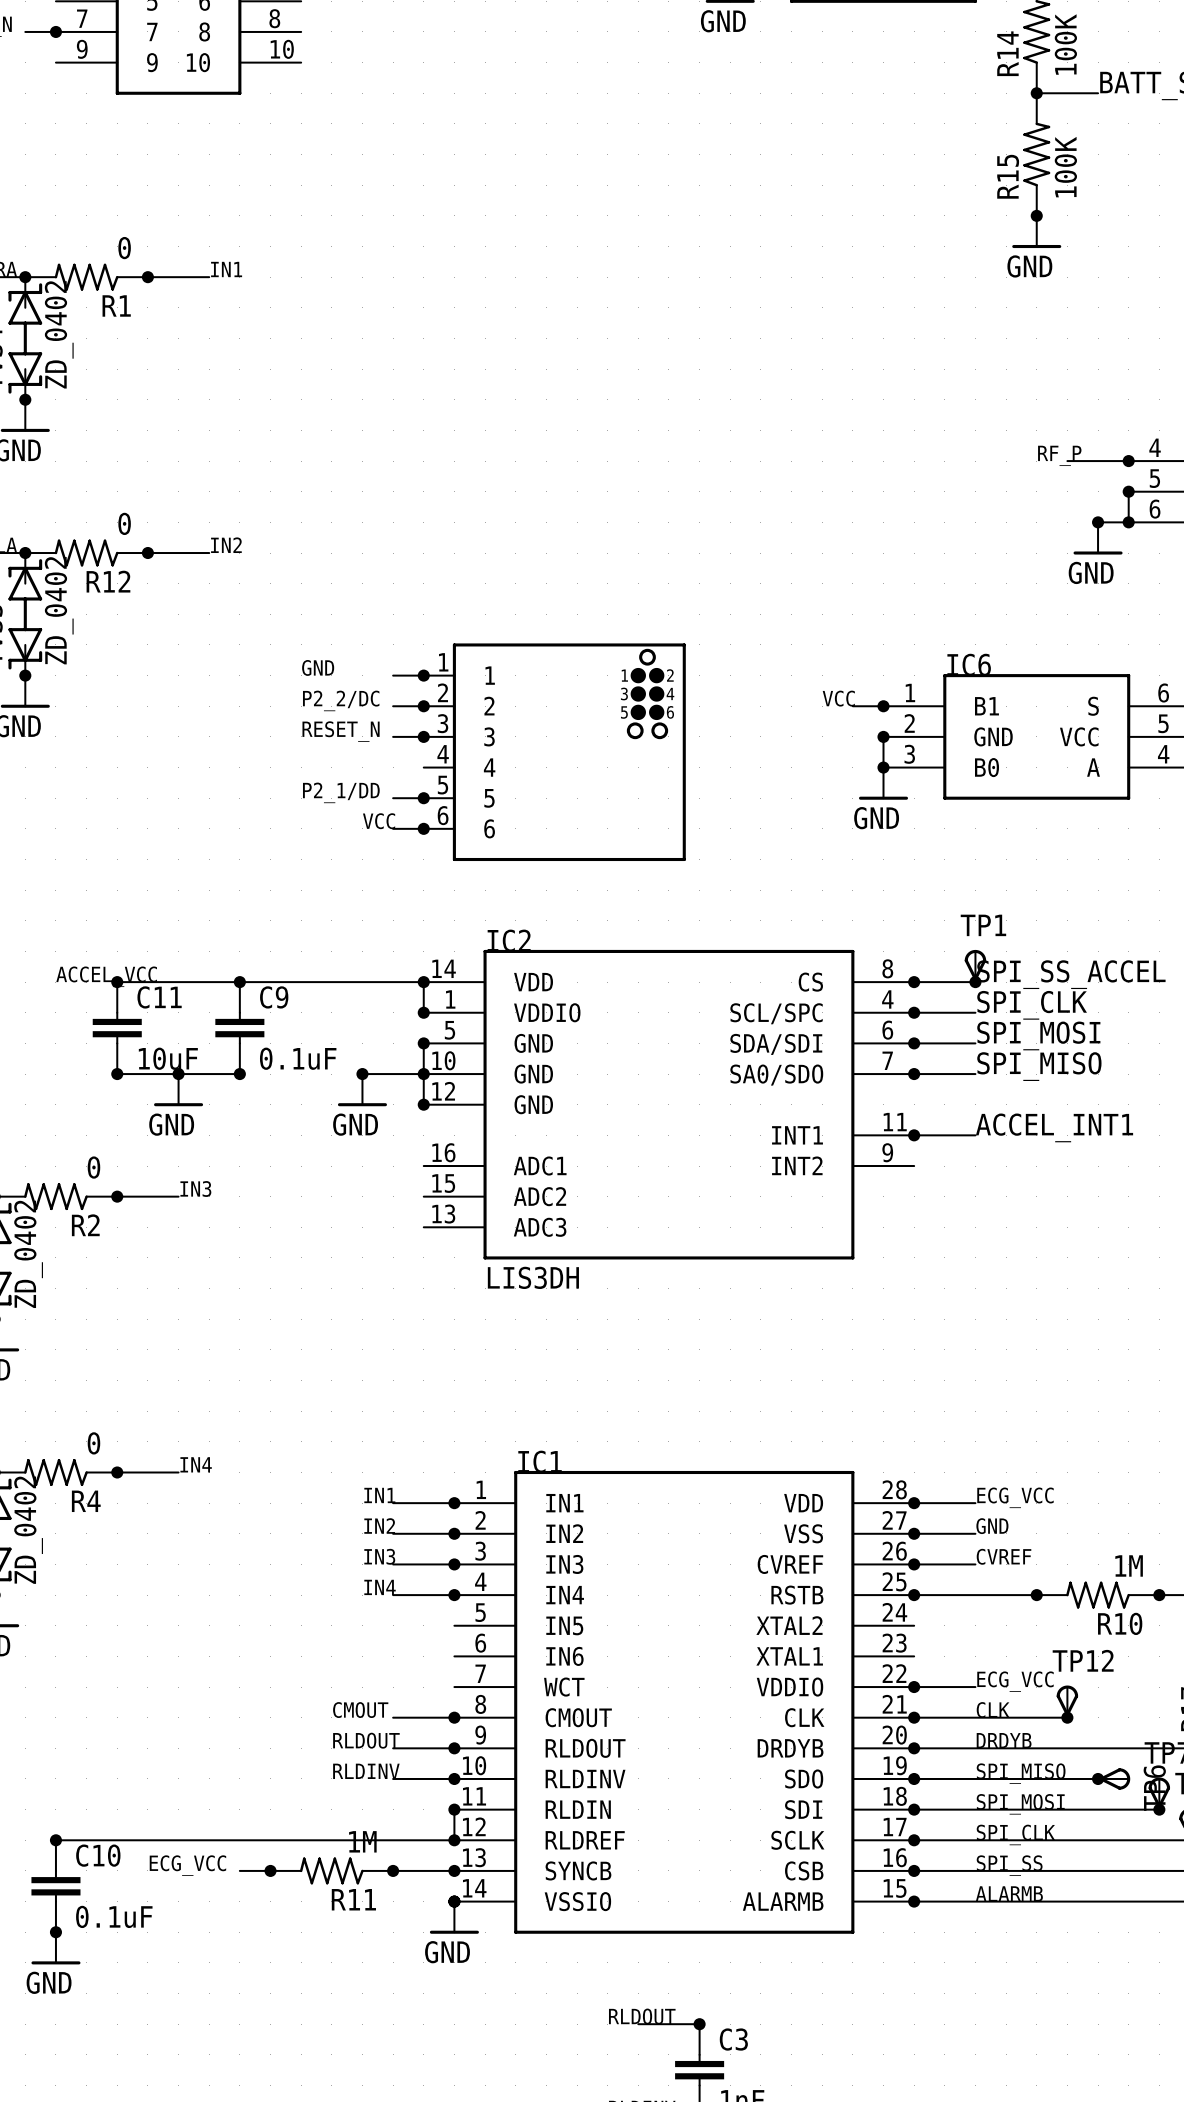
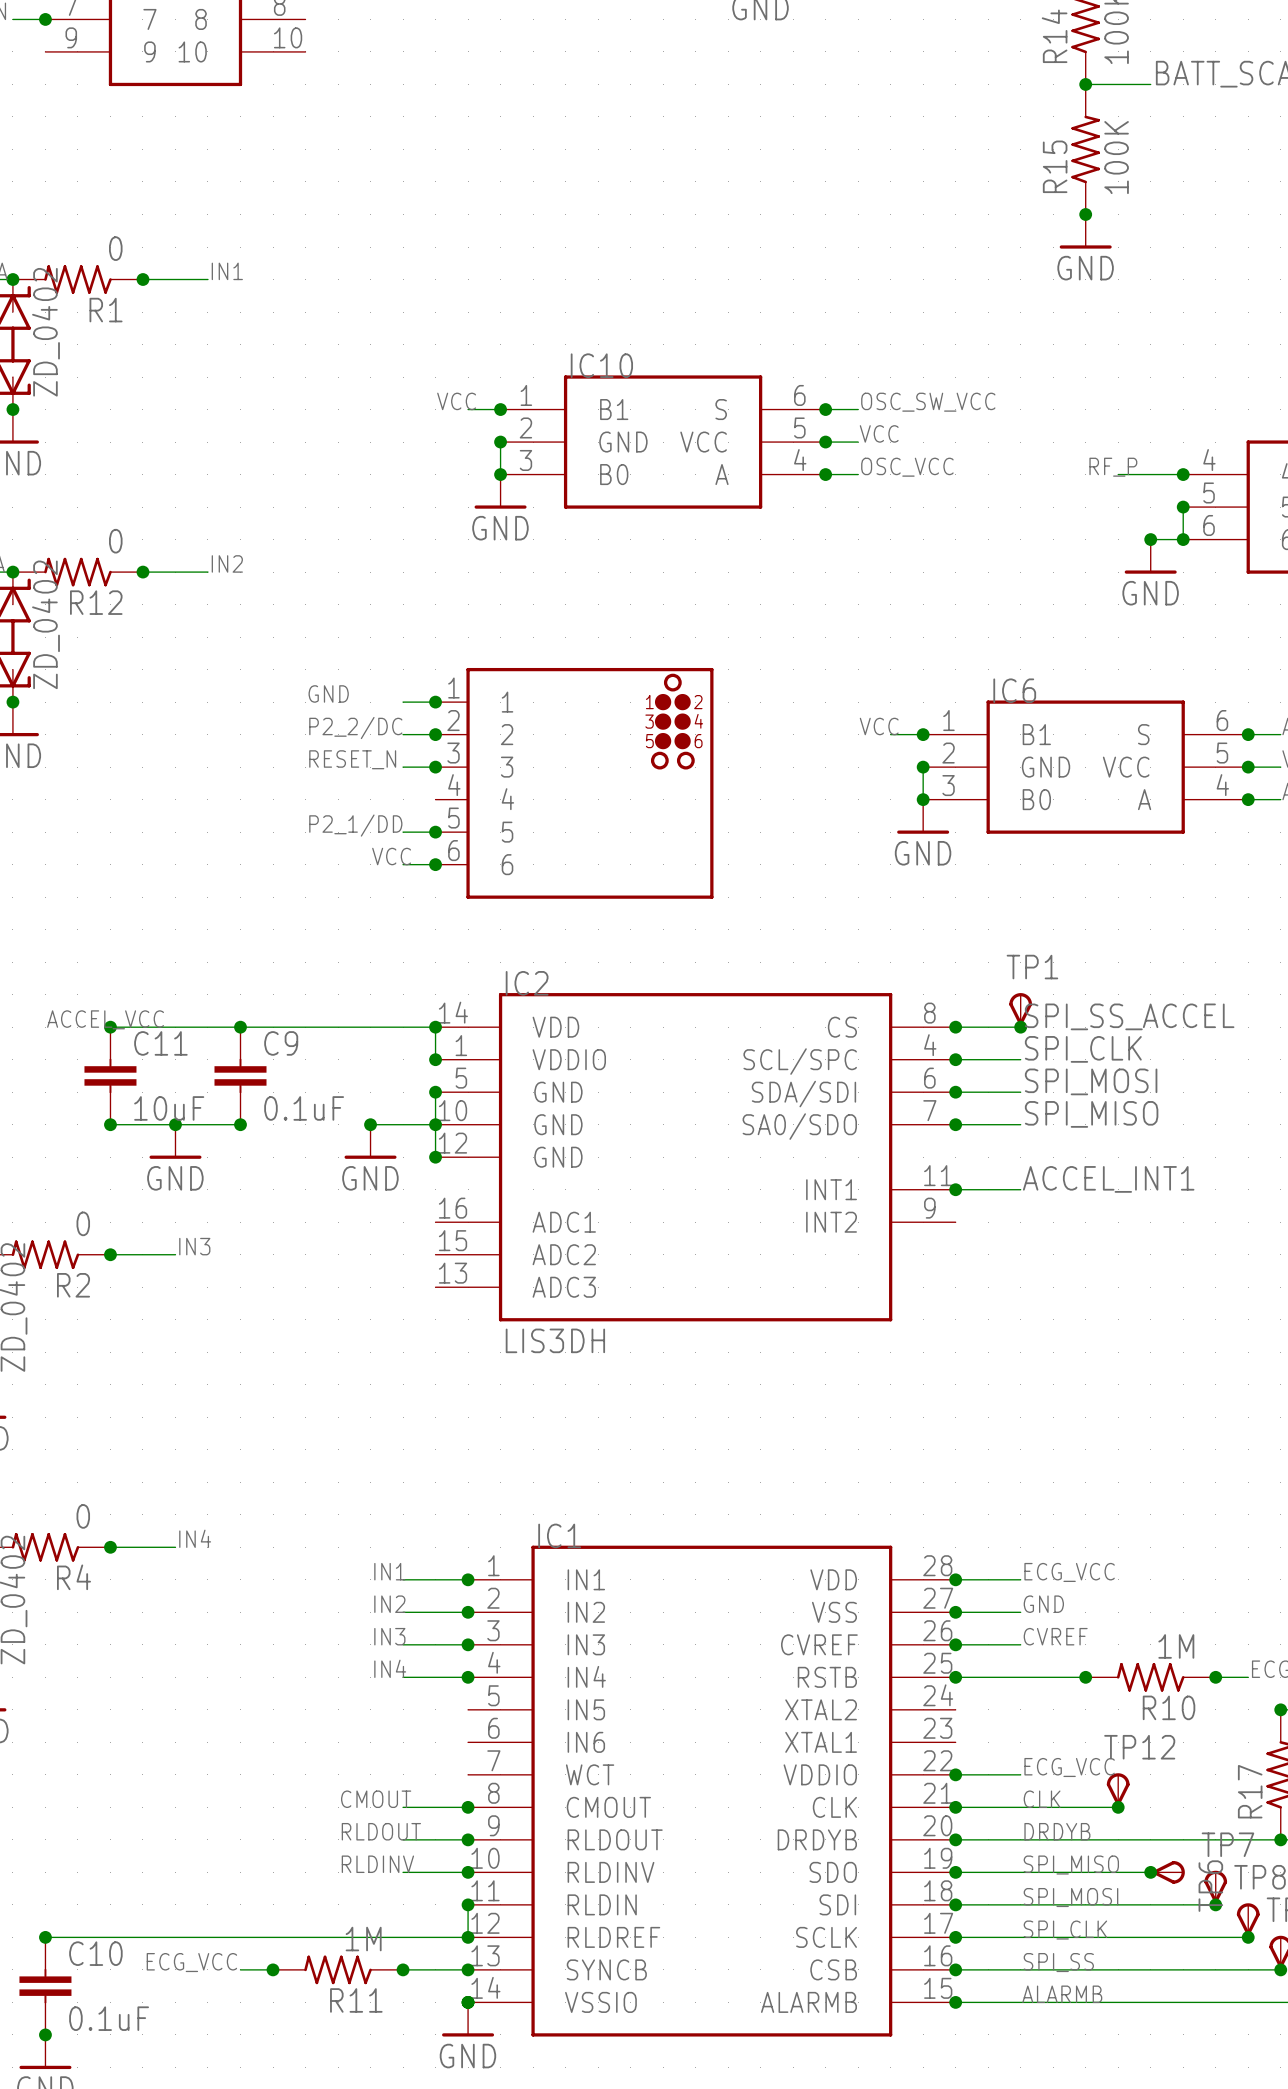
label: none -> VCC (456, 401)
label: none -> OSC_SW_VCC (928, 402)
wire: none -> (468, 409) (500, 409)
junction: none -> (500, 409)
wire: none -> (825, 409) (858, 409)
junction: none -> (825, 409)
label: none -> VCC (879, 433)
wire: none -> (500, 442) (500, 474)
junction: none -> (500, 442)
IC10: none -> (663, 442)
wire: none -> (825, 442) (858, 442)
junction: none -> (825, 442)
label: none -> OSC_VCC (907, 467)
junction: none -> (500, 474)
wire: none -> (825, 474) (858, 474)
junction: none -> (825, 474)
power symbol: none -> GND (500, 491)

